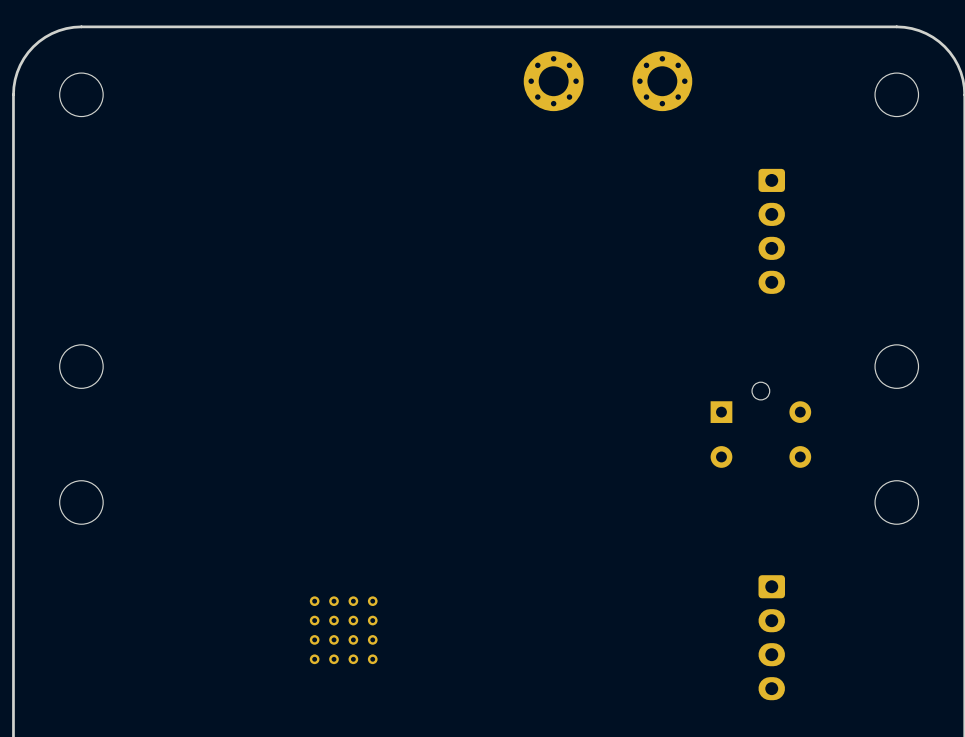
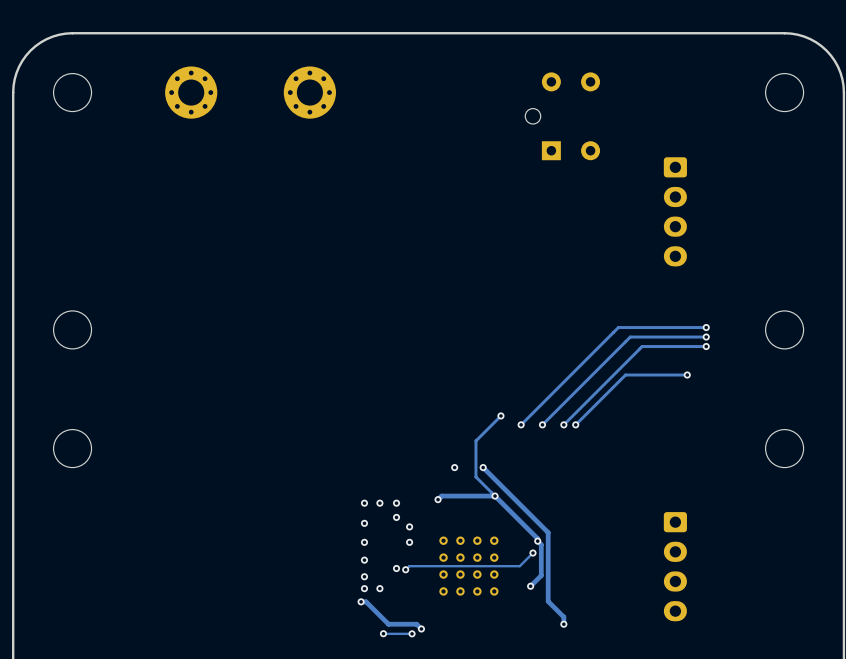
part: (553, 81) -> none
part: (662, 81) -> none
part: none -> (191, 92)
part: none -> (309, 92)
track: none -> (706, 327) (618, 327) (521, 424)
via: none -> (706, 327)
track: none -> (706, 337) (630, 337) (542, 424)
via: none -> (706, 337)
track: none -> (706, 346) (642, 346) (563, 424)
via: none -> (706, 346)
track: none -> (687, 375) (625, 375) (575, 424)
via: none -> (687, 375)
part rotation: 0° (760, 425) -> 90° counterclockwise (562, 116)
part position: (760, 425) -> (562, 116)
track: none -> (500, 415) (475, 440) (475, 477) (495, 496)
via: none -> (500, 415)
via: none -> (521, 424)
via: none -> (542, 424)
via: none -> (563, 424)
via: none -> (575, 424)
via: none -> (454, 467)
track: none -> (483, 467) (548, 532) (548, 601) (563, 617) (563, 624)
via: none -> (483, 467)
track: none -> (495, 496) (537, 538) (541, 544) (541, 575) (530, 586)
track: none -> (495, 496) (441, 496) (438, 499)
via: none -> (495, 496)
via: none -> (438, 499)
via: none -> (364, 503)
via: none -> (379, 503)
via: none -> (396, 503)
via: none -> (396, 517)
via: none -> (364, 523)
via: none -> (409, 526)
via: none -> (537, 541)
via: none -> (364, 542)
via: none -> (409, 542)
track: none -> (532, 553) (519, 566) (409, 566) (405, 569)
via: none -> (532, 553)
part position: (343, 630) -> (468, 566)
via: none -> (364, 560)
via: none -> (396, 568)
via: none -> (405, 569)
via: none -> (364, 576)
via: none -> (530, 586)
via: none -> (364, 588)
via: none -> (379, 588)
track: none -> (361, 601) (366, 601) (388, 624) (416, 624) (421, 628)
via: none -> (361, 601)
via: none -> (563, 624)
via: none -> (421, 628)
via: none -> (383, 633)
track: none -> (412, 633) (383, 633)
via: none -> (412, 633)

